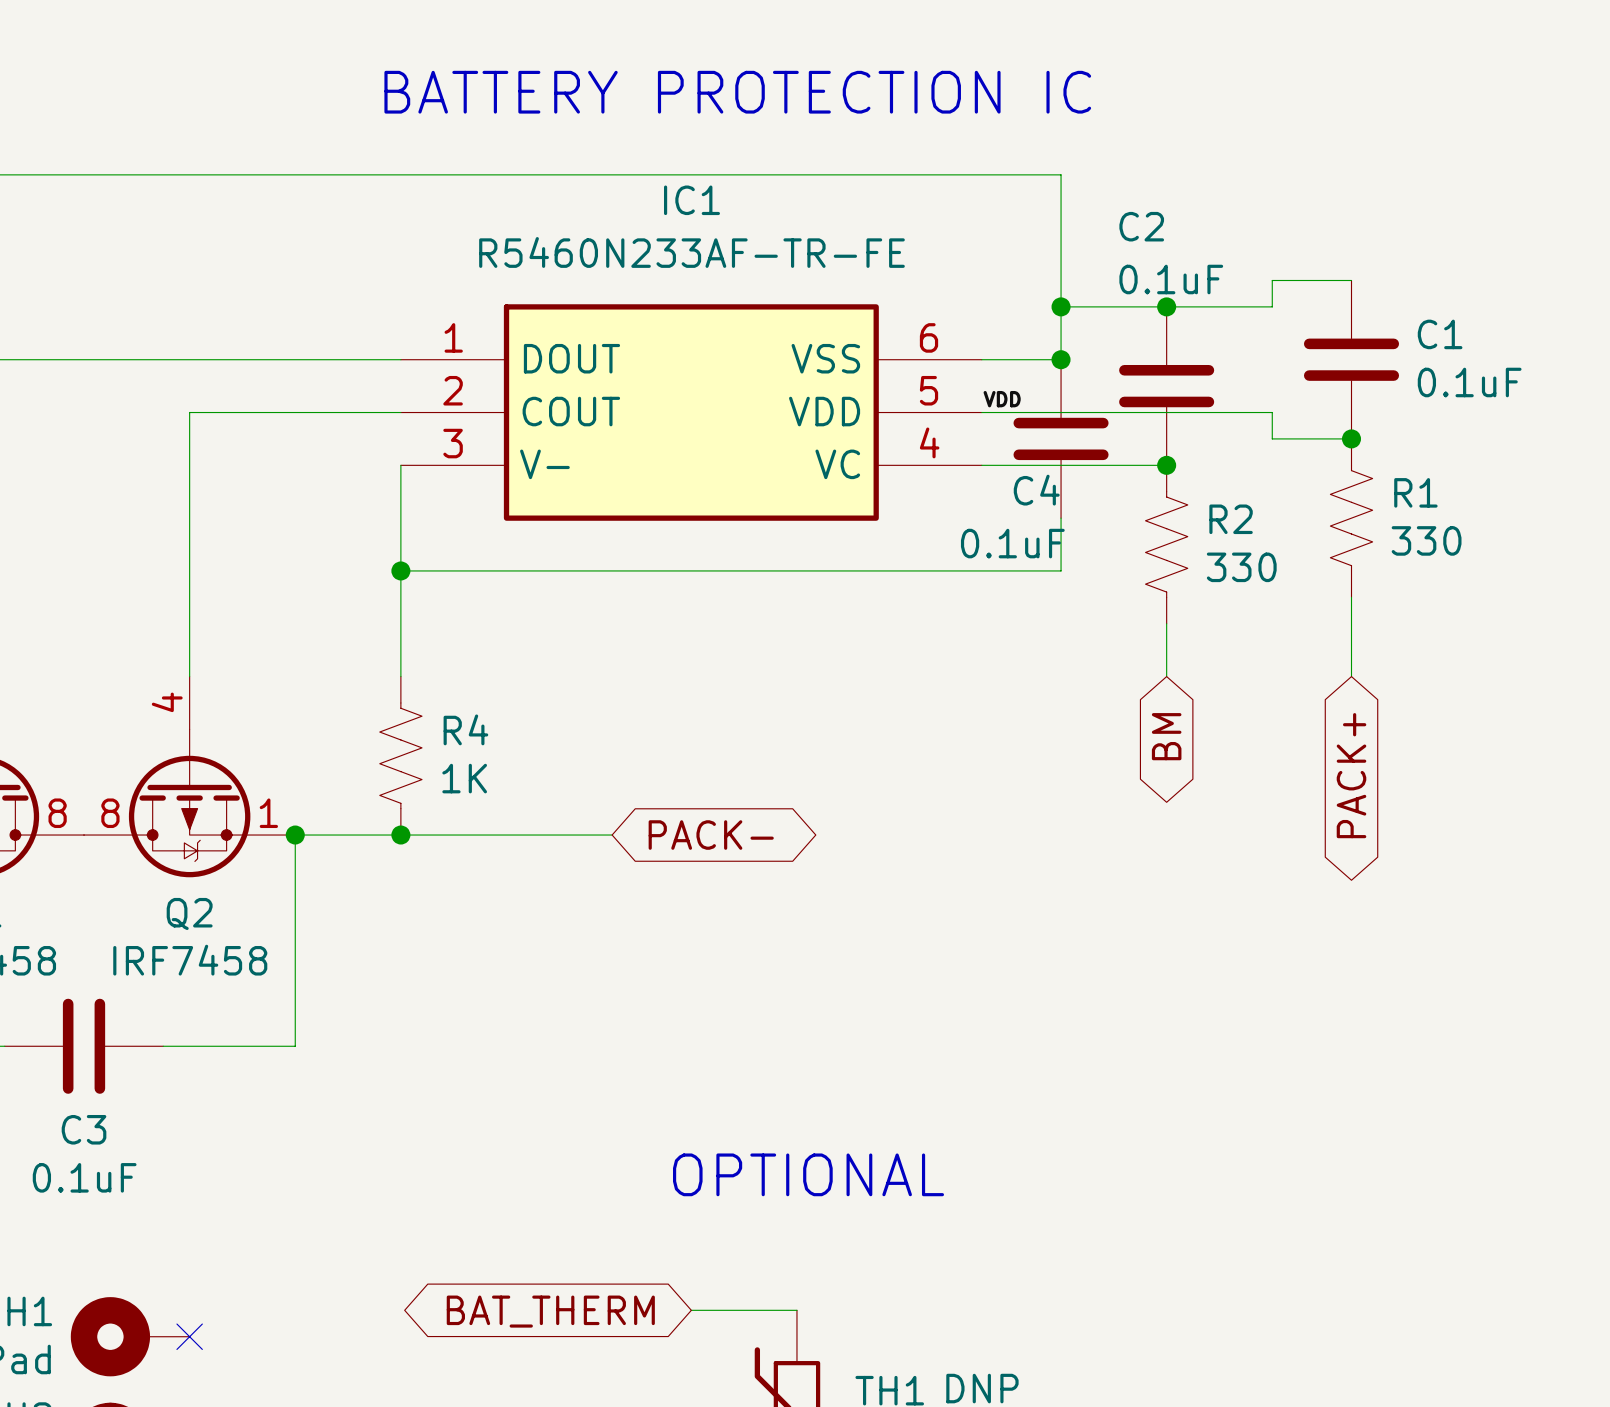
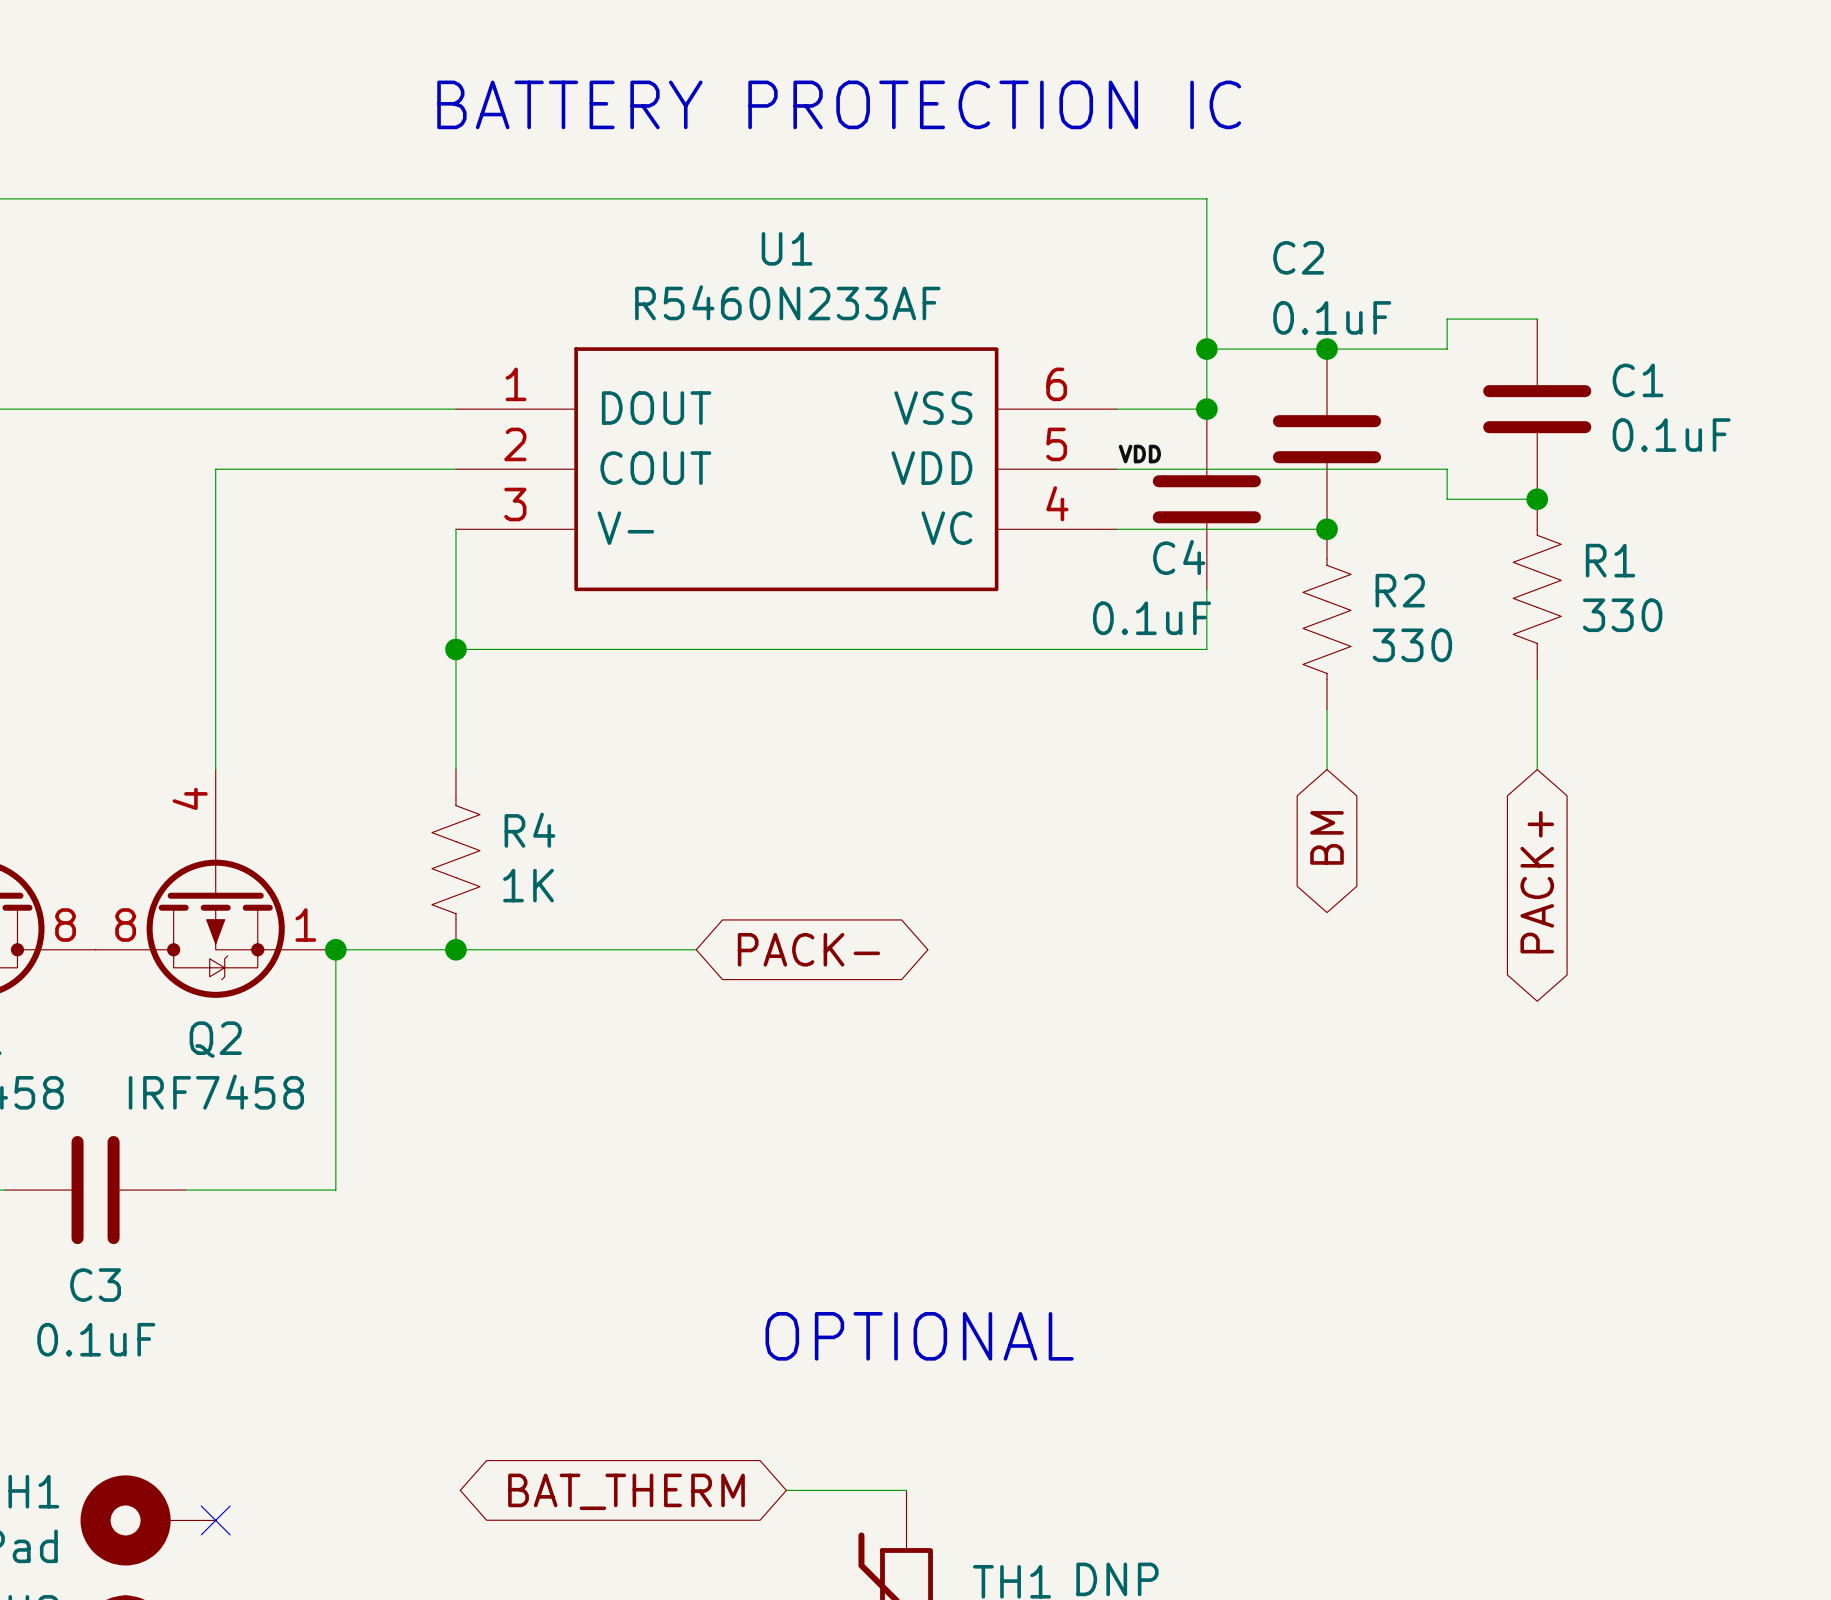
IC1: R5460N233AF-TR-FE (691, 412) -> none
U1: none -> R5460N233AF (786, 469)

